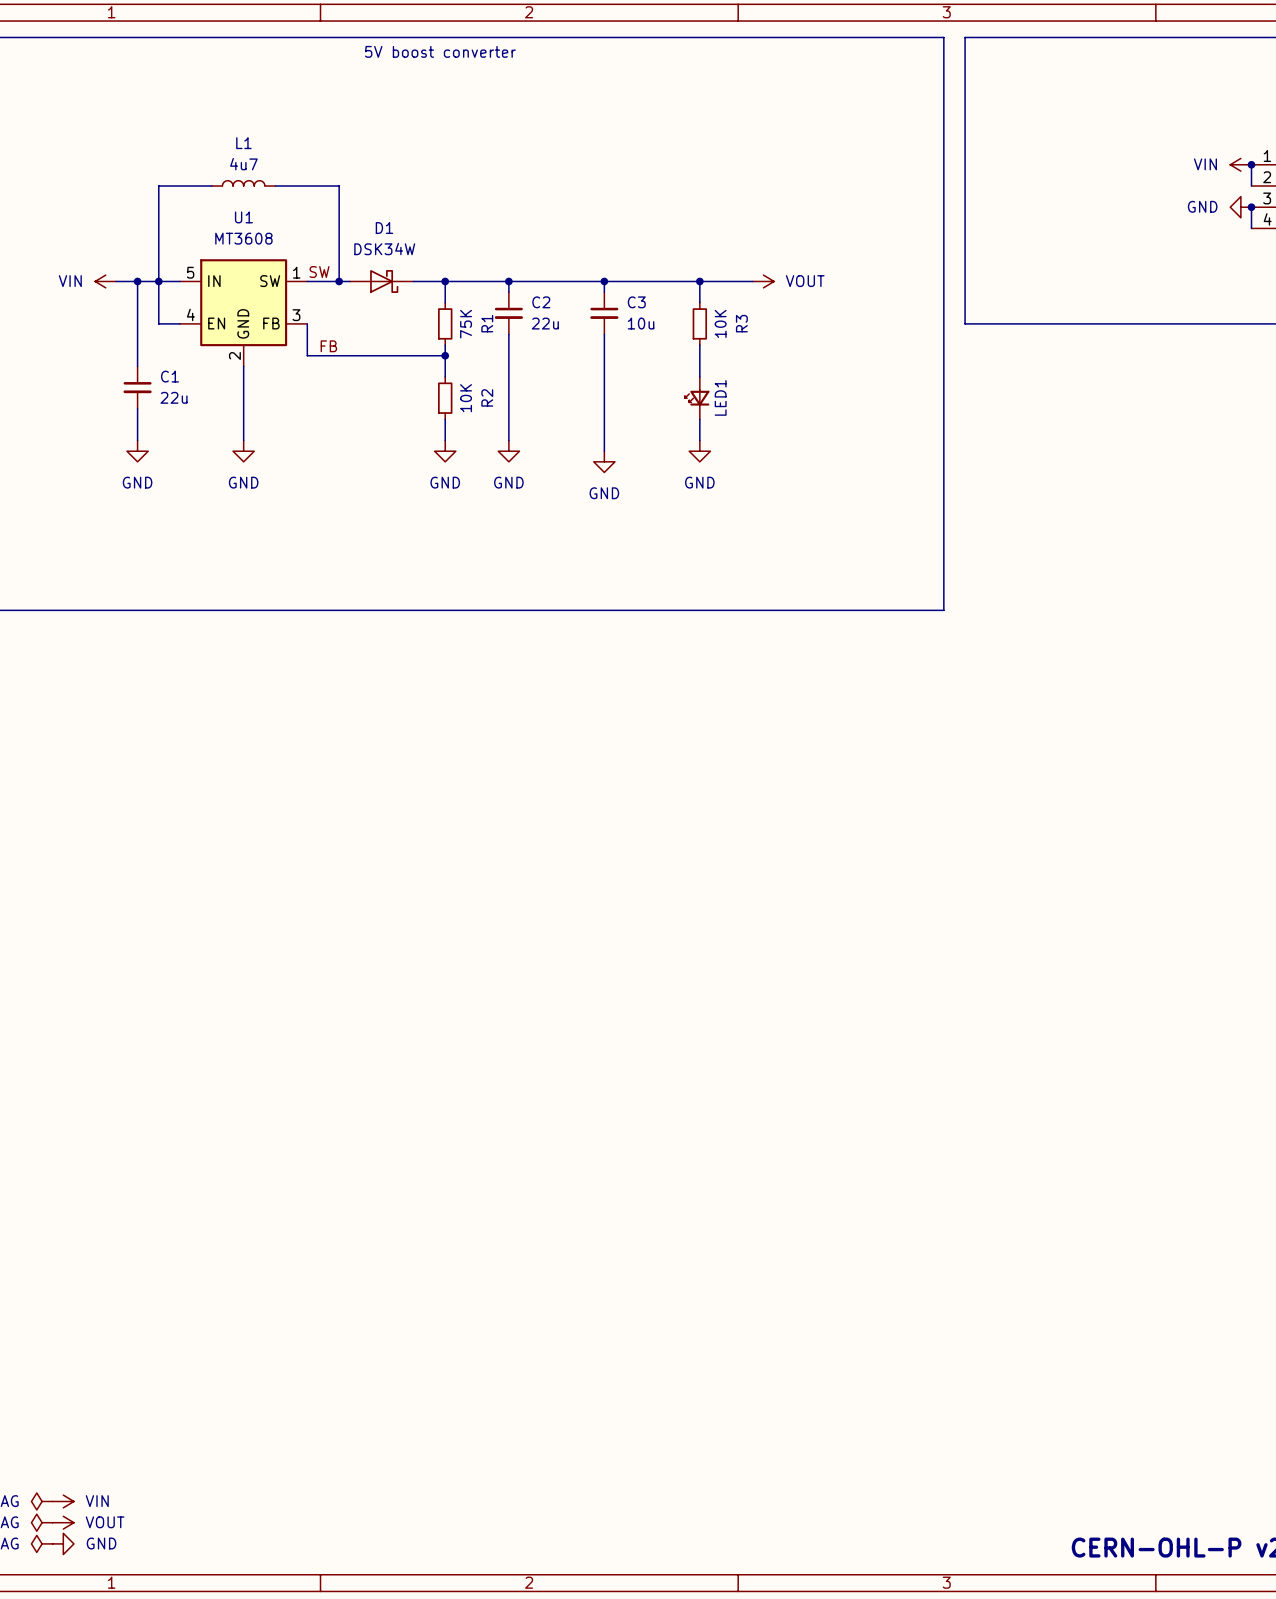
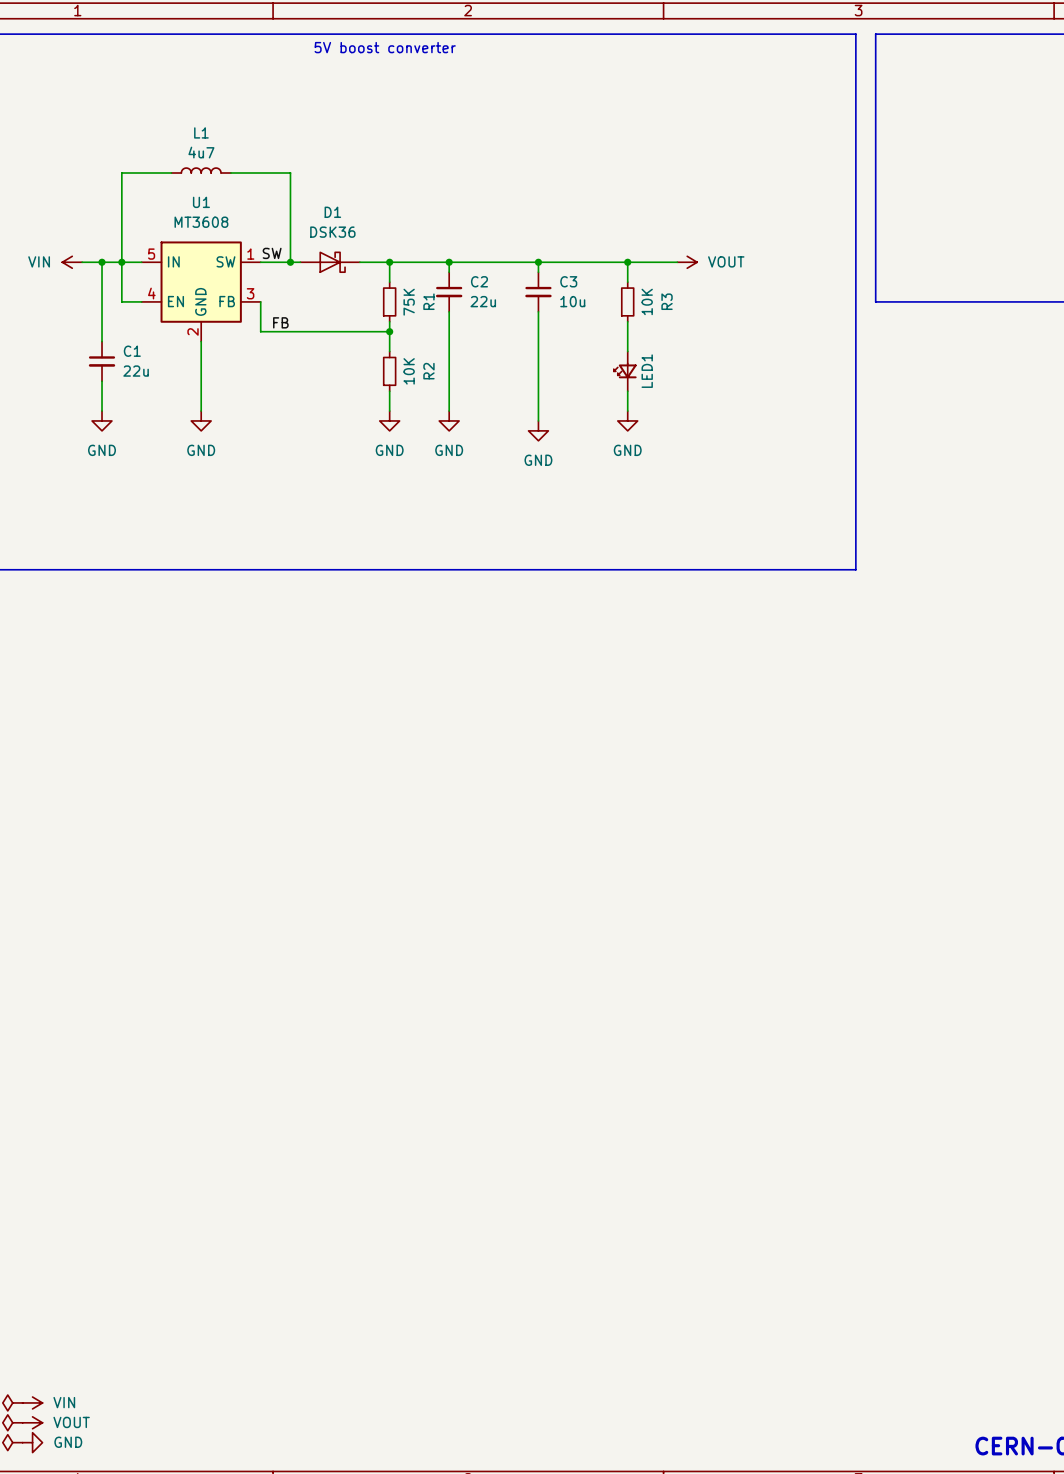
D1 value: DSK34W (384, 249) -> DSK36 (332, 232)

